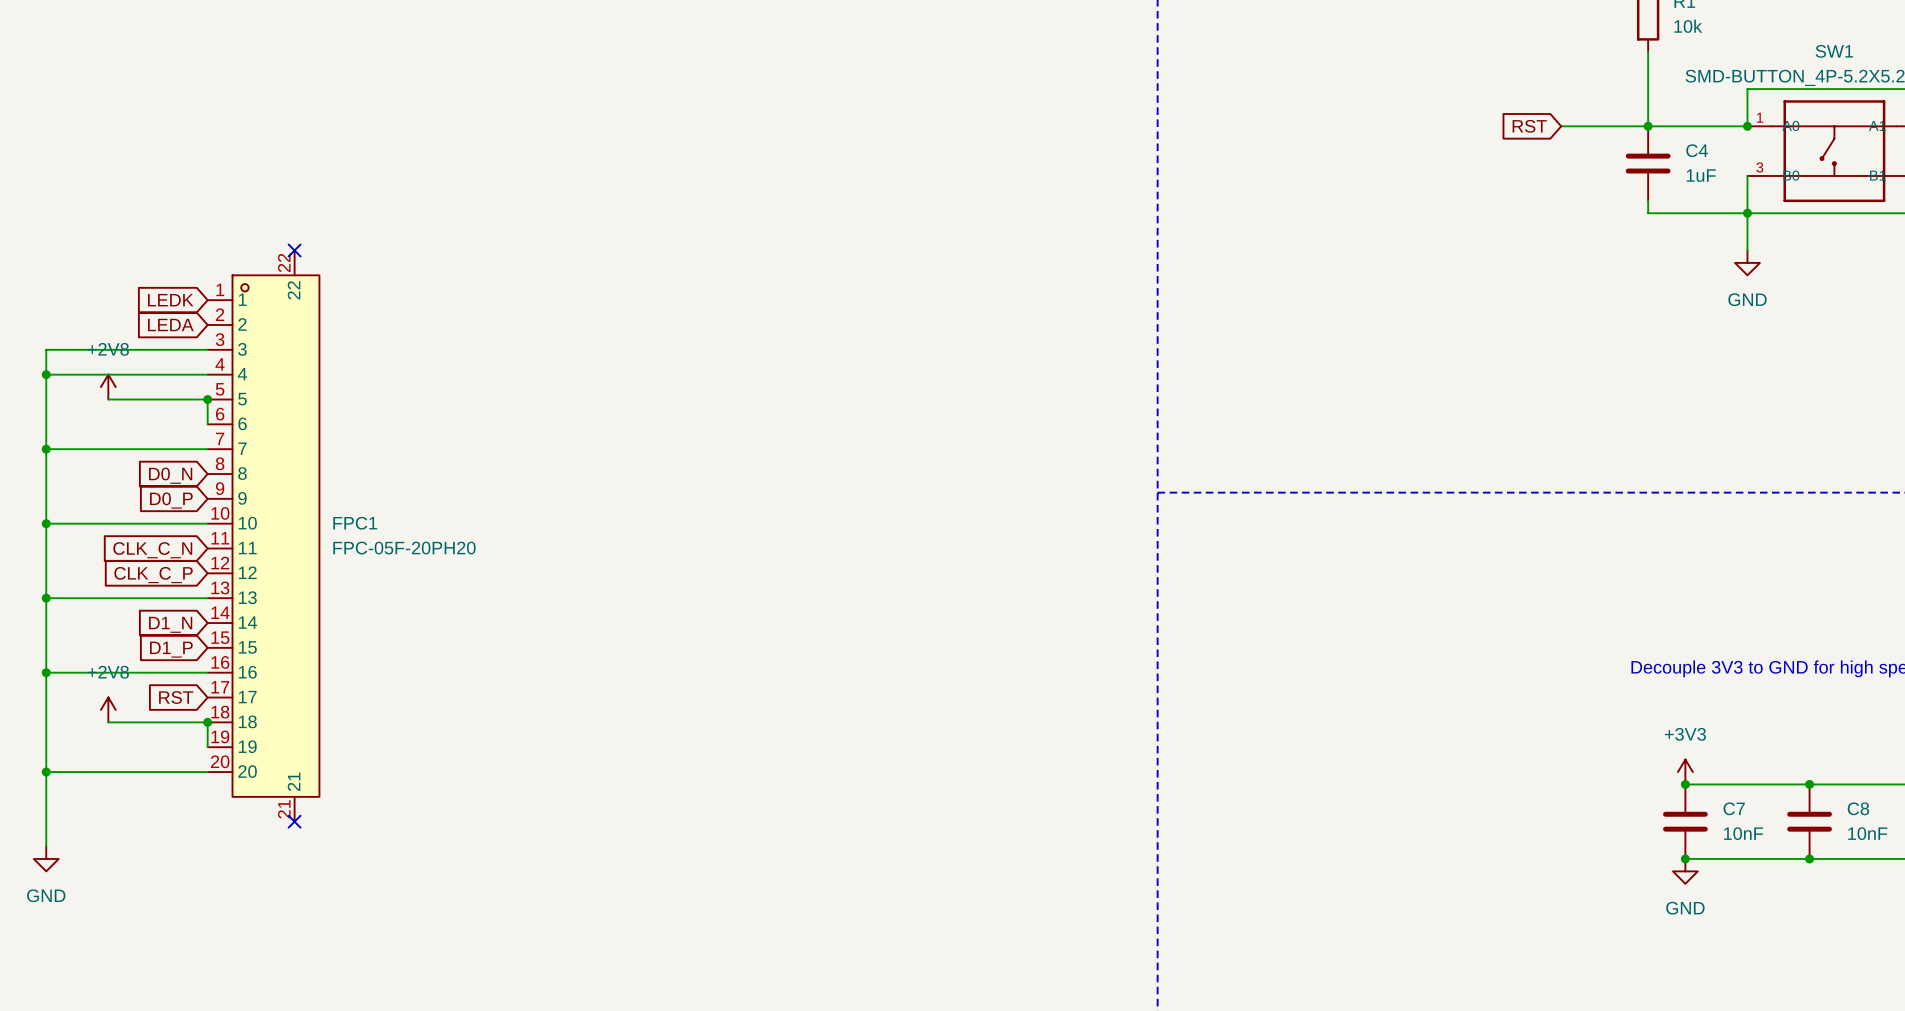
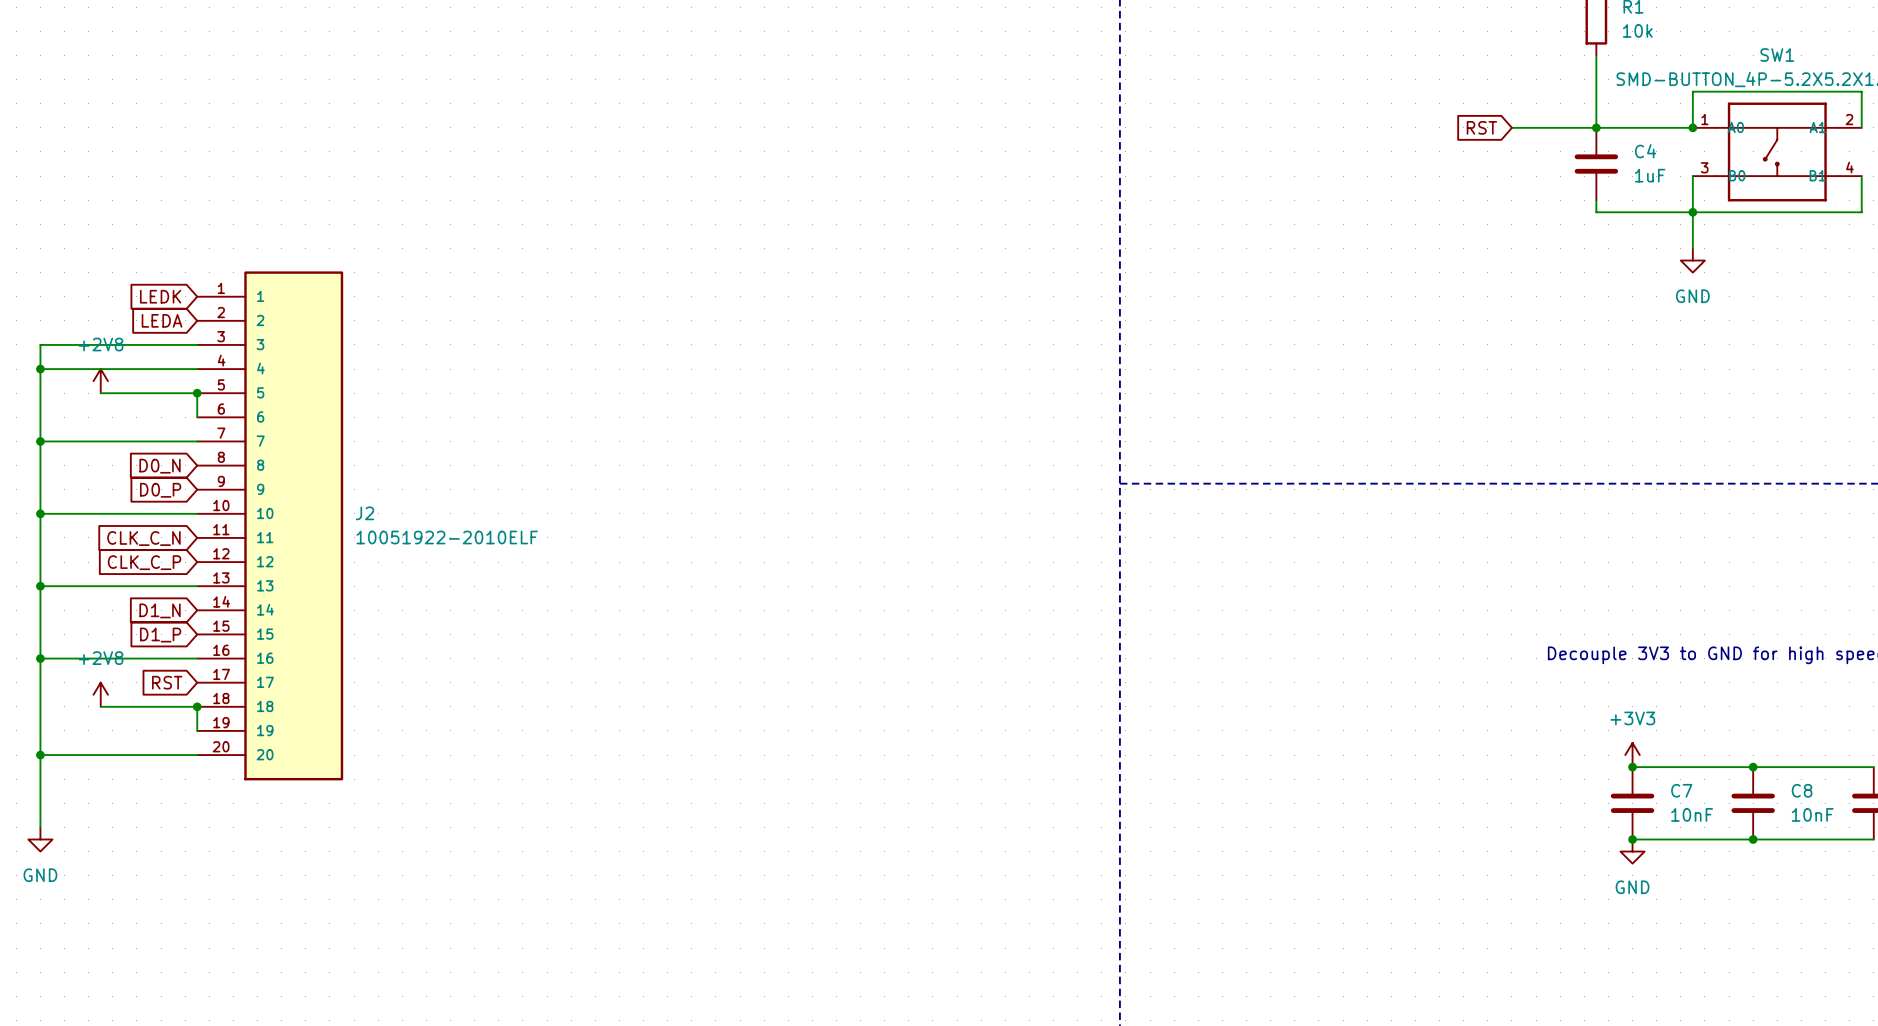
no-connect mark: (294, 250) -> none
FPC1: FPC-05F-20PH20 (263, 536) -> none
J2: none -> 10051922-2010ELF (270, 525)
no-connect mark: (294, 821) -> none

